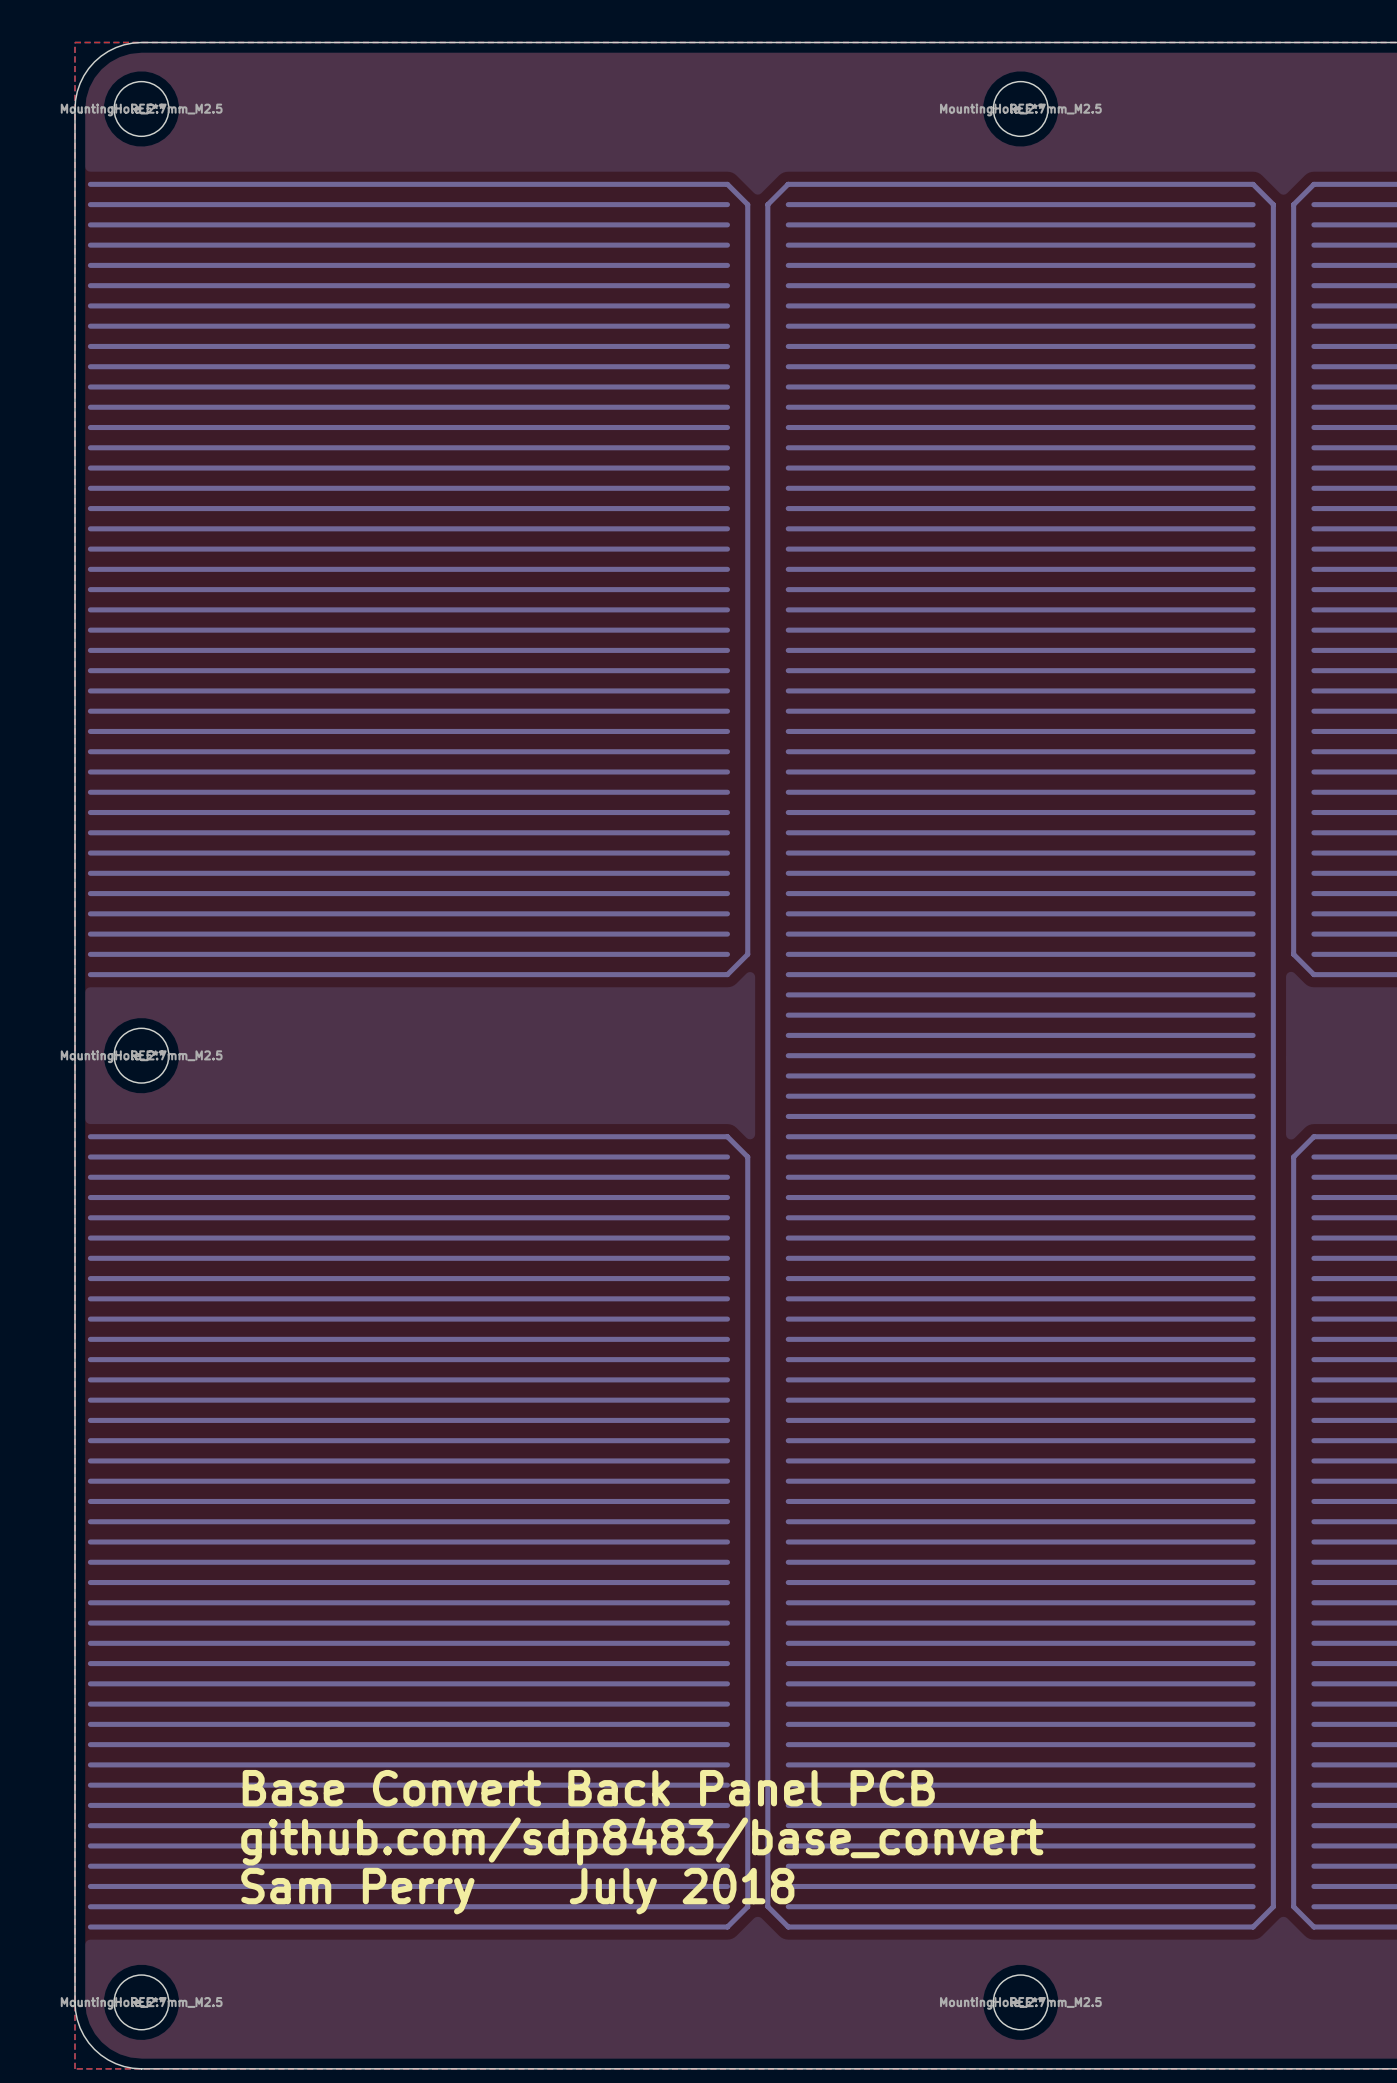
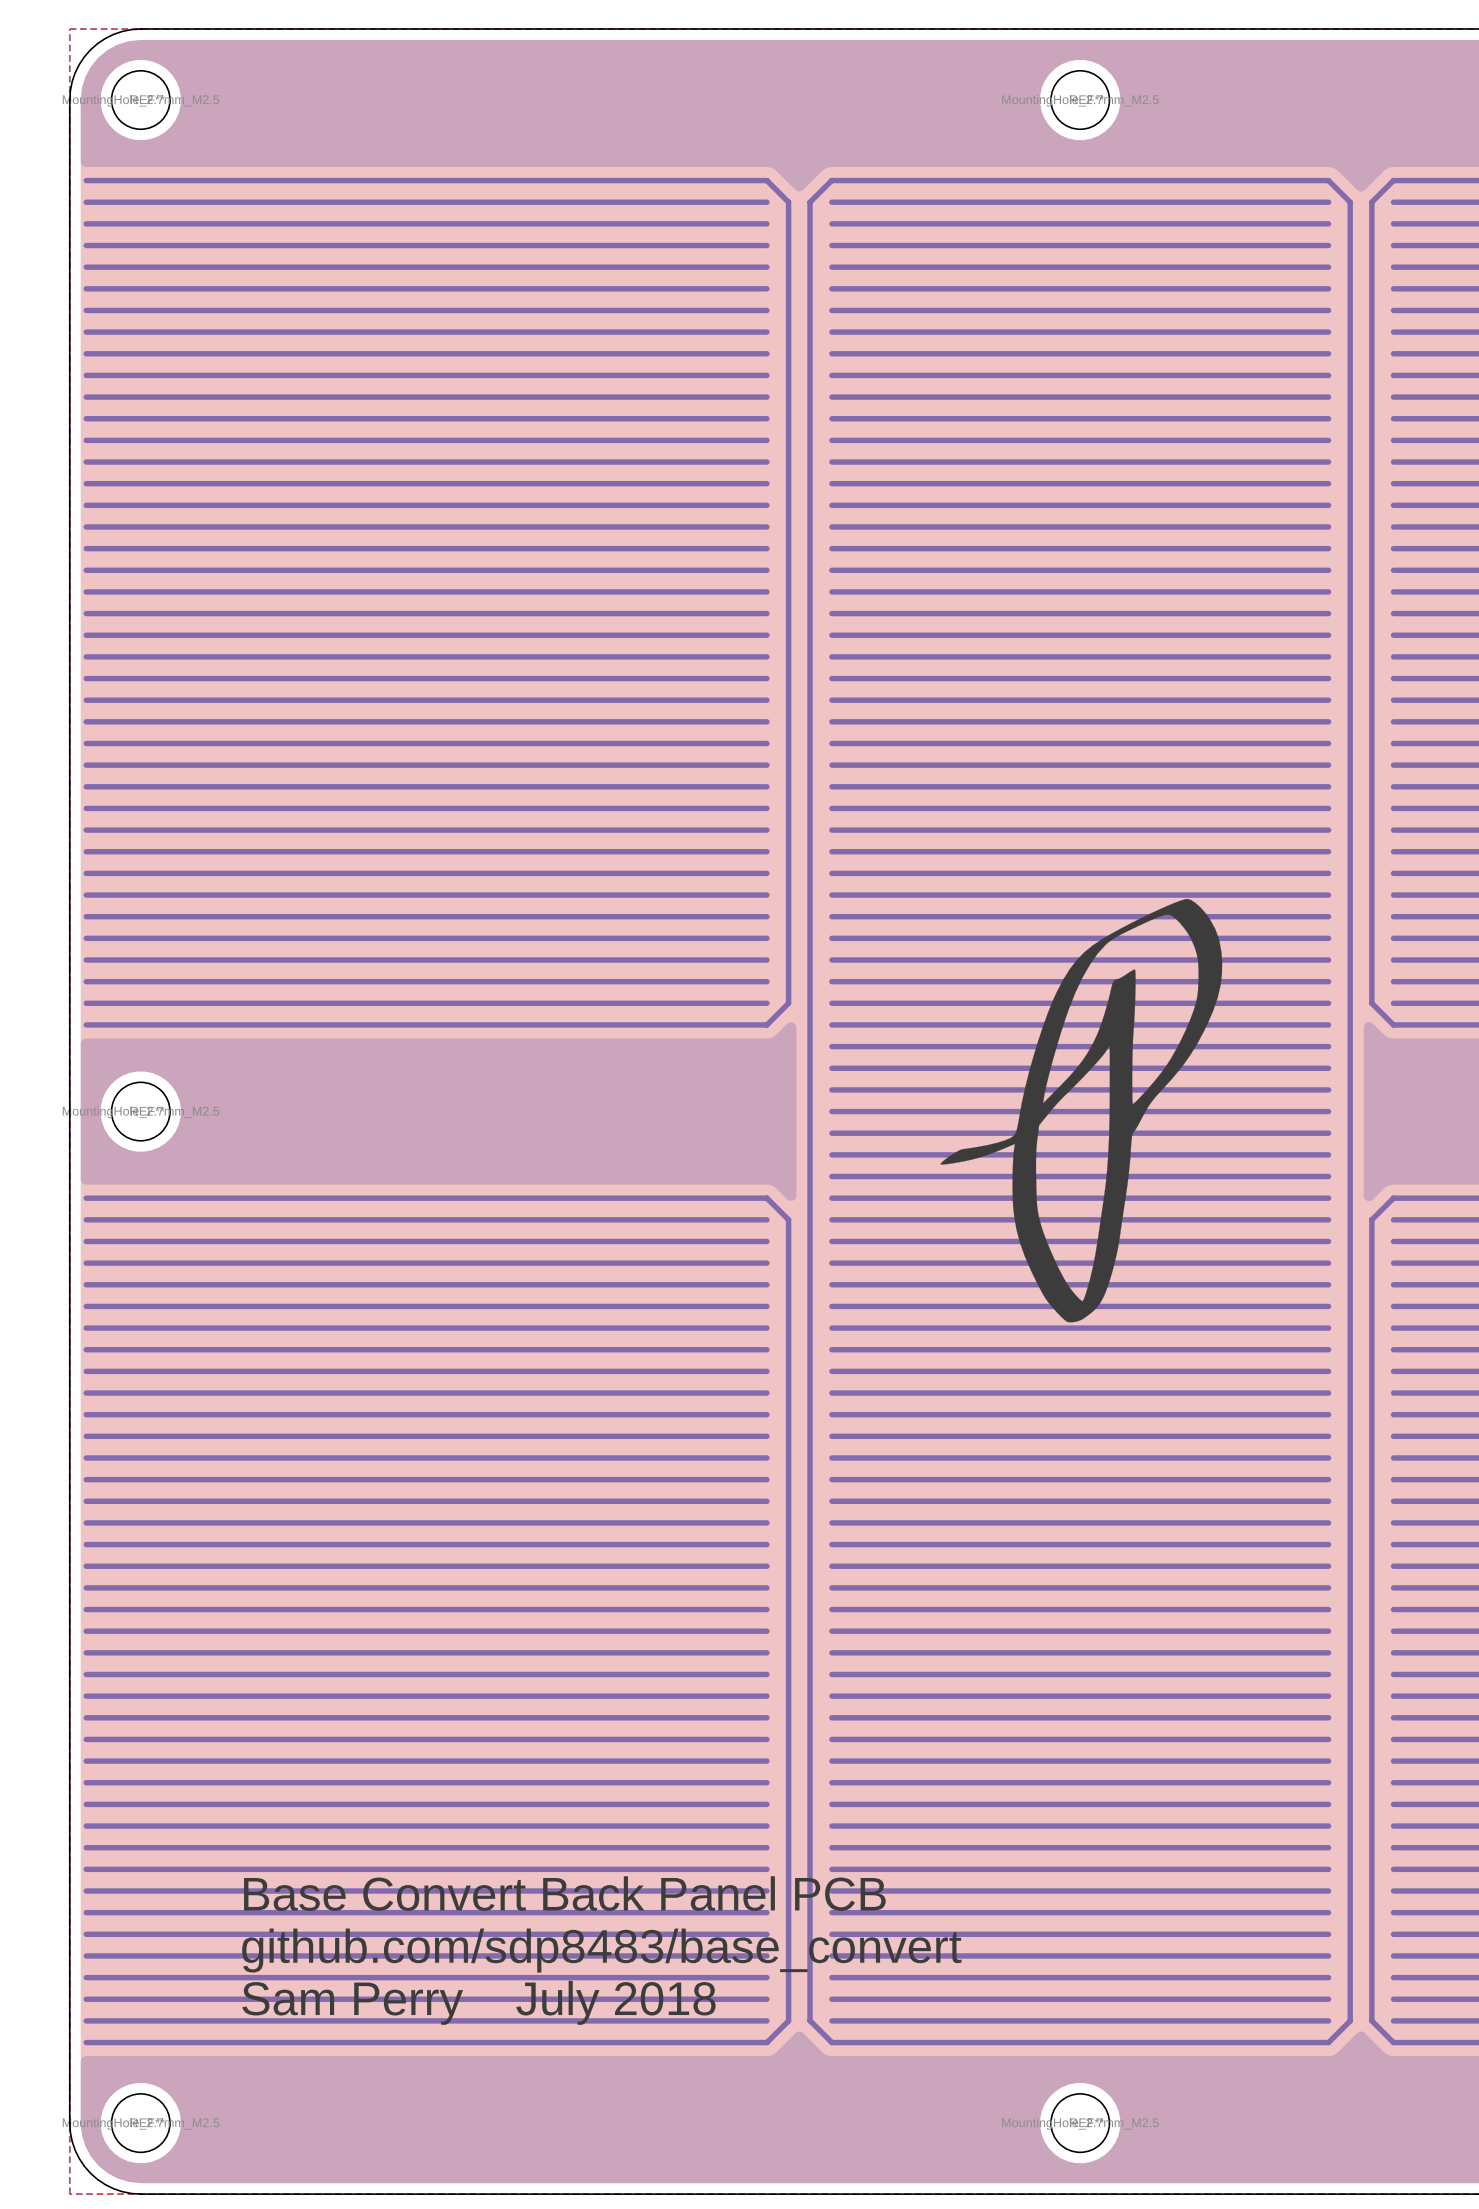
drawing: none -> [940, 898, 1223, 1323]

